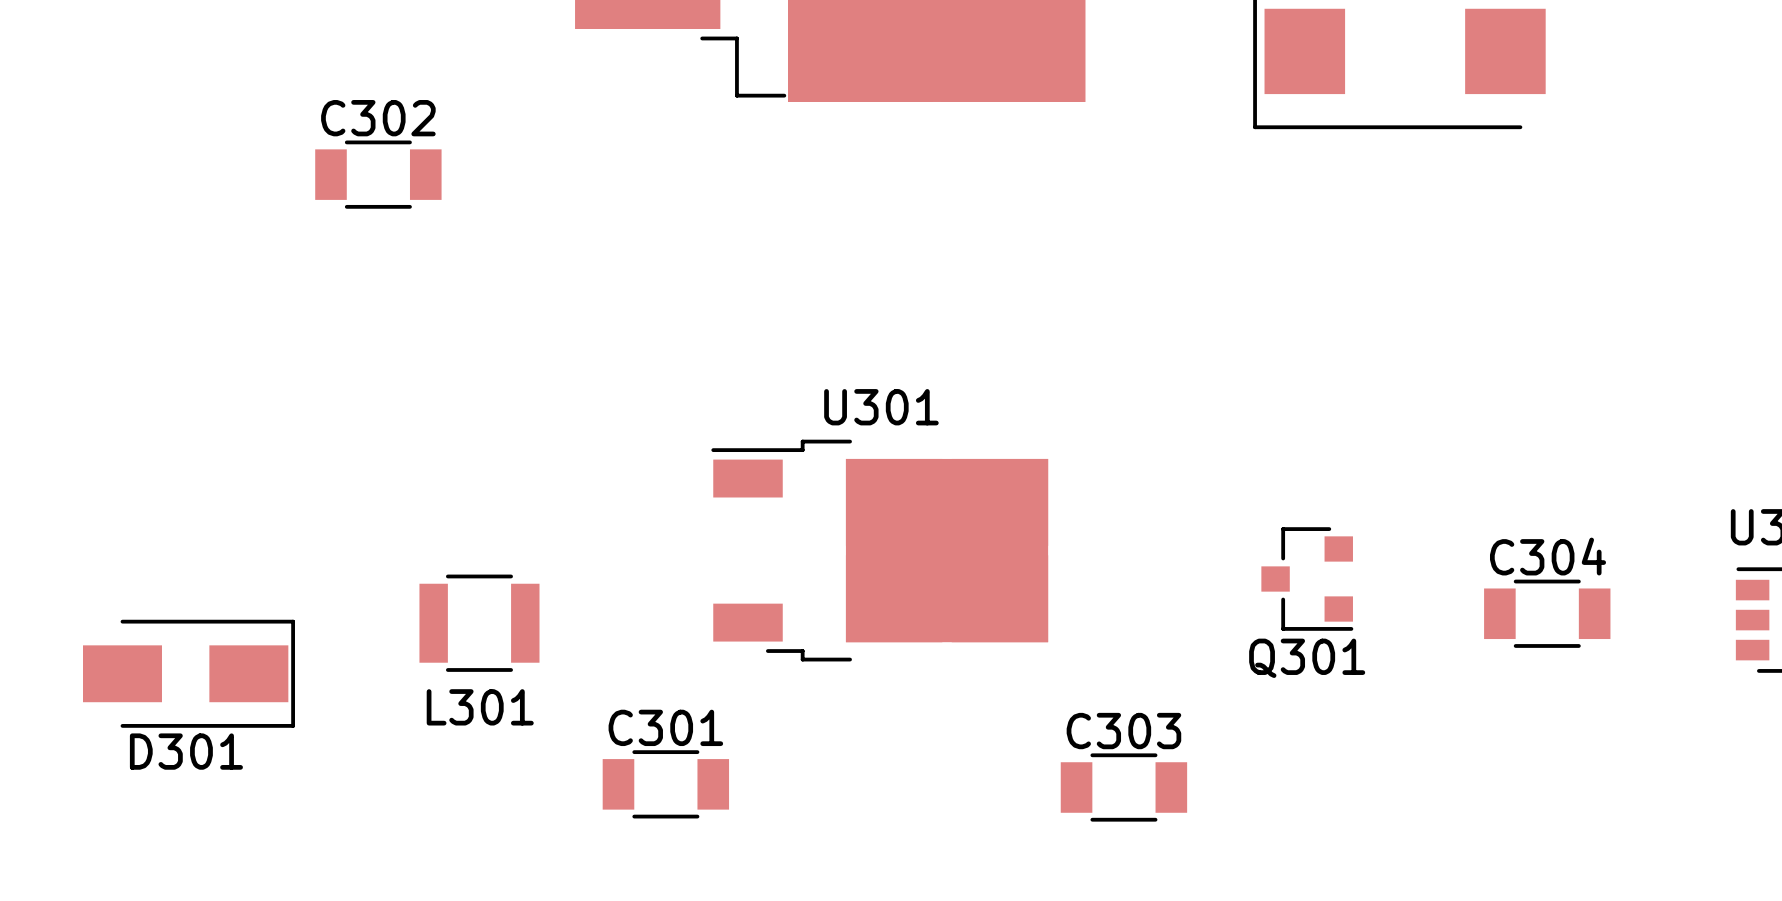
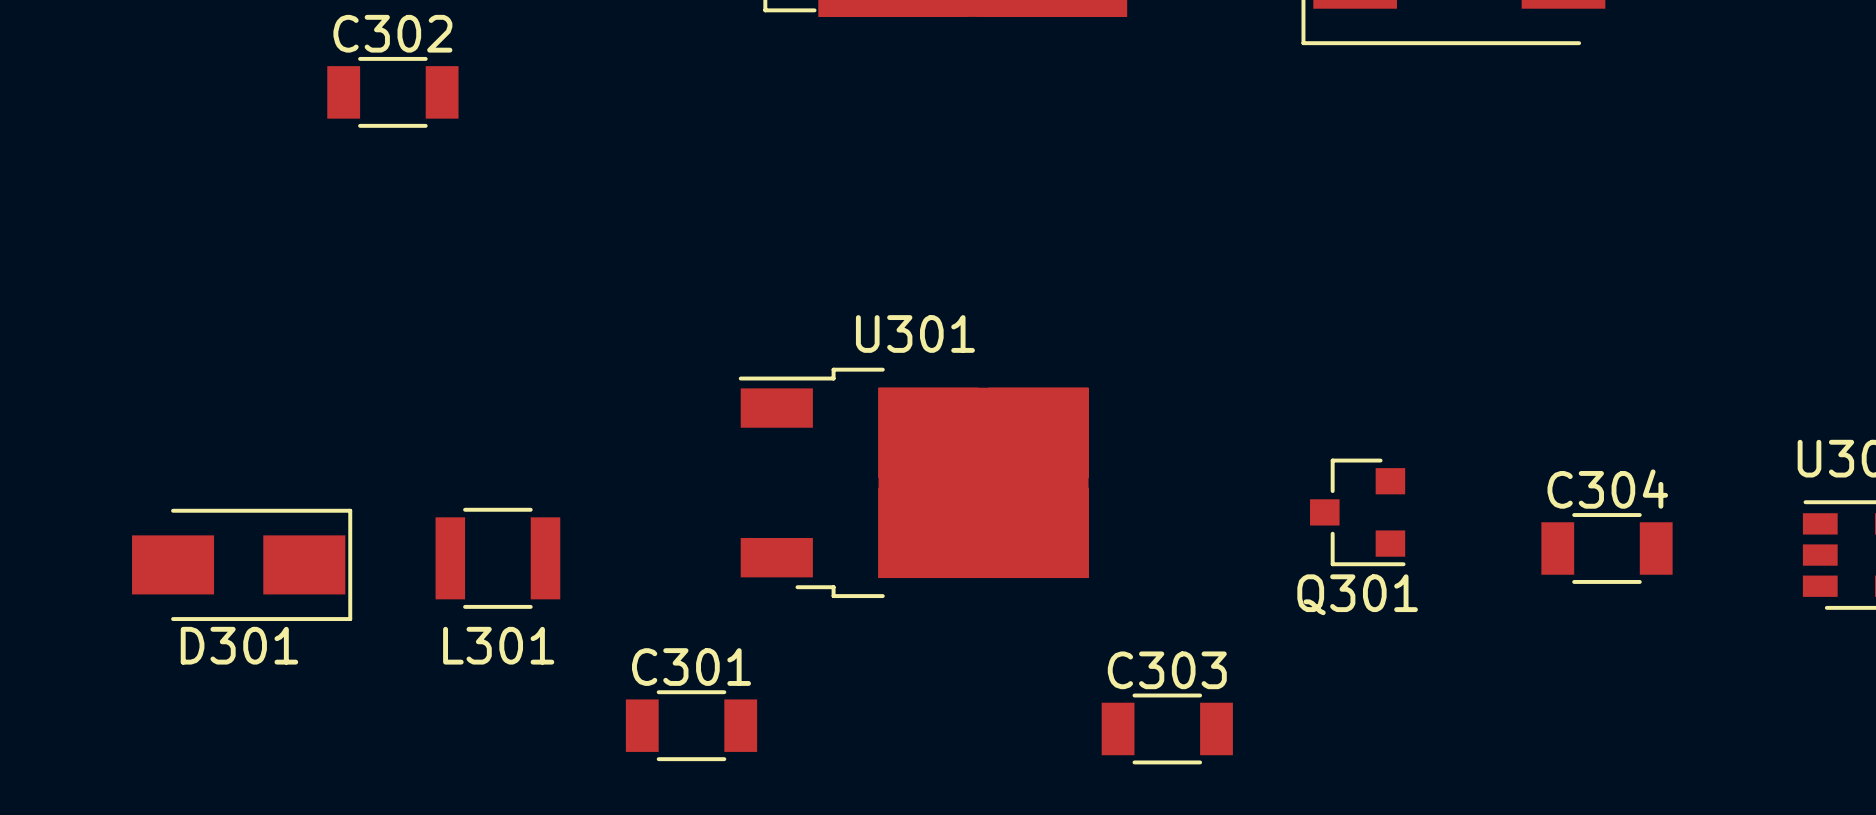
D301 position: (188, 673) -> (242, 564)

